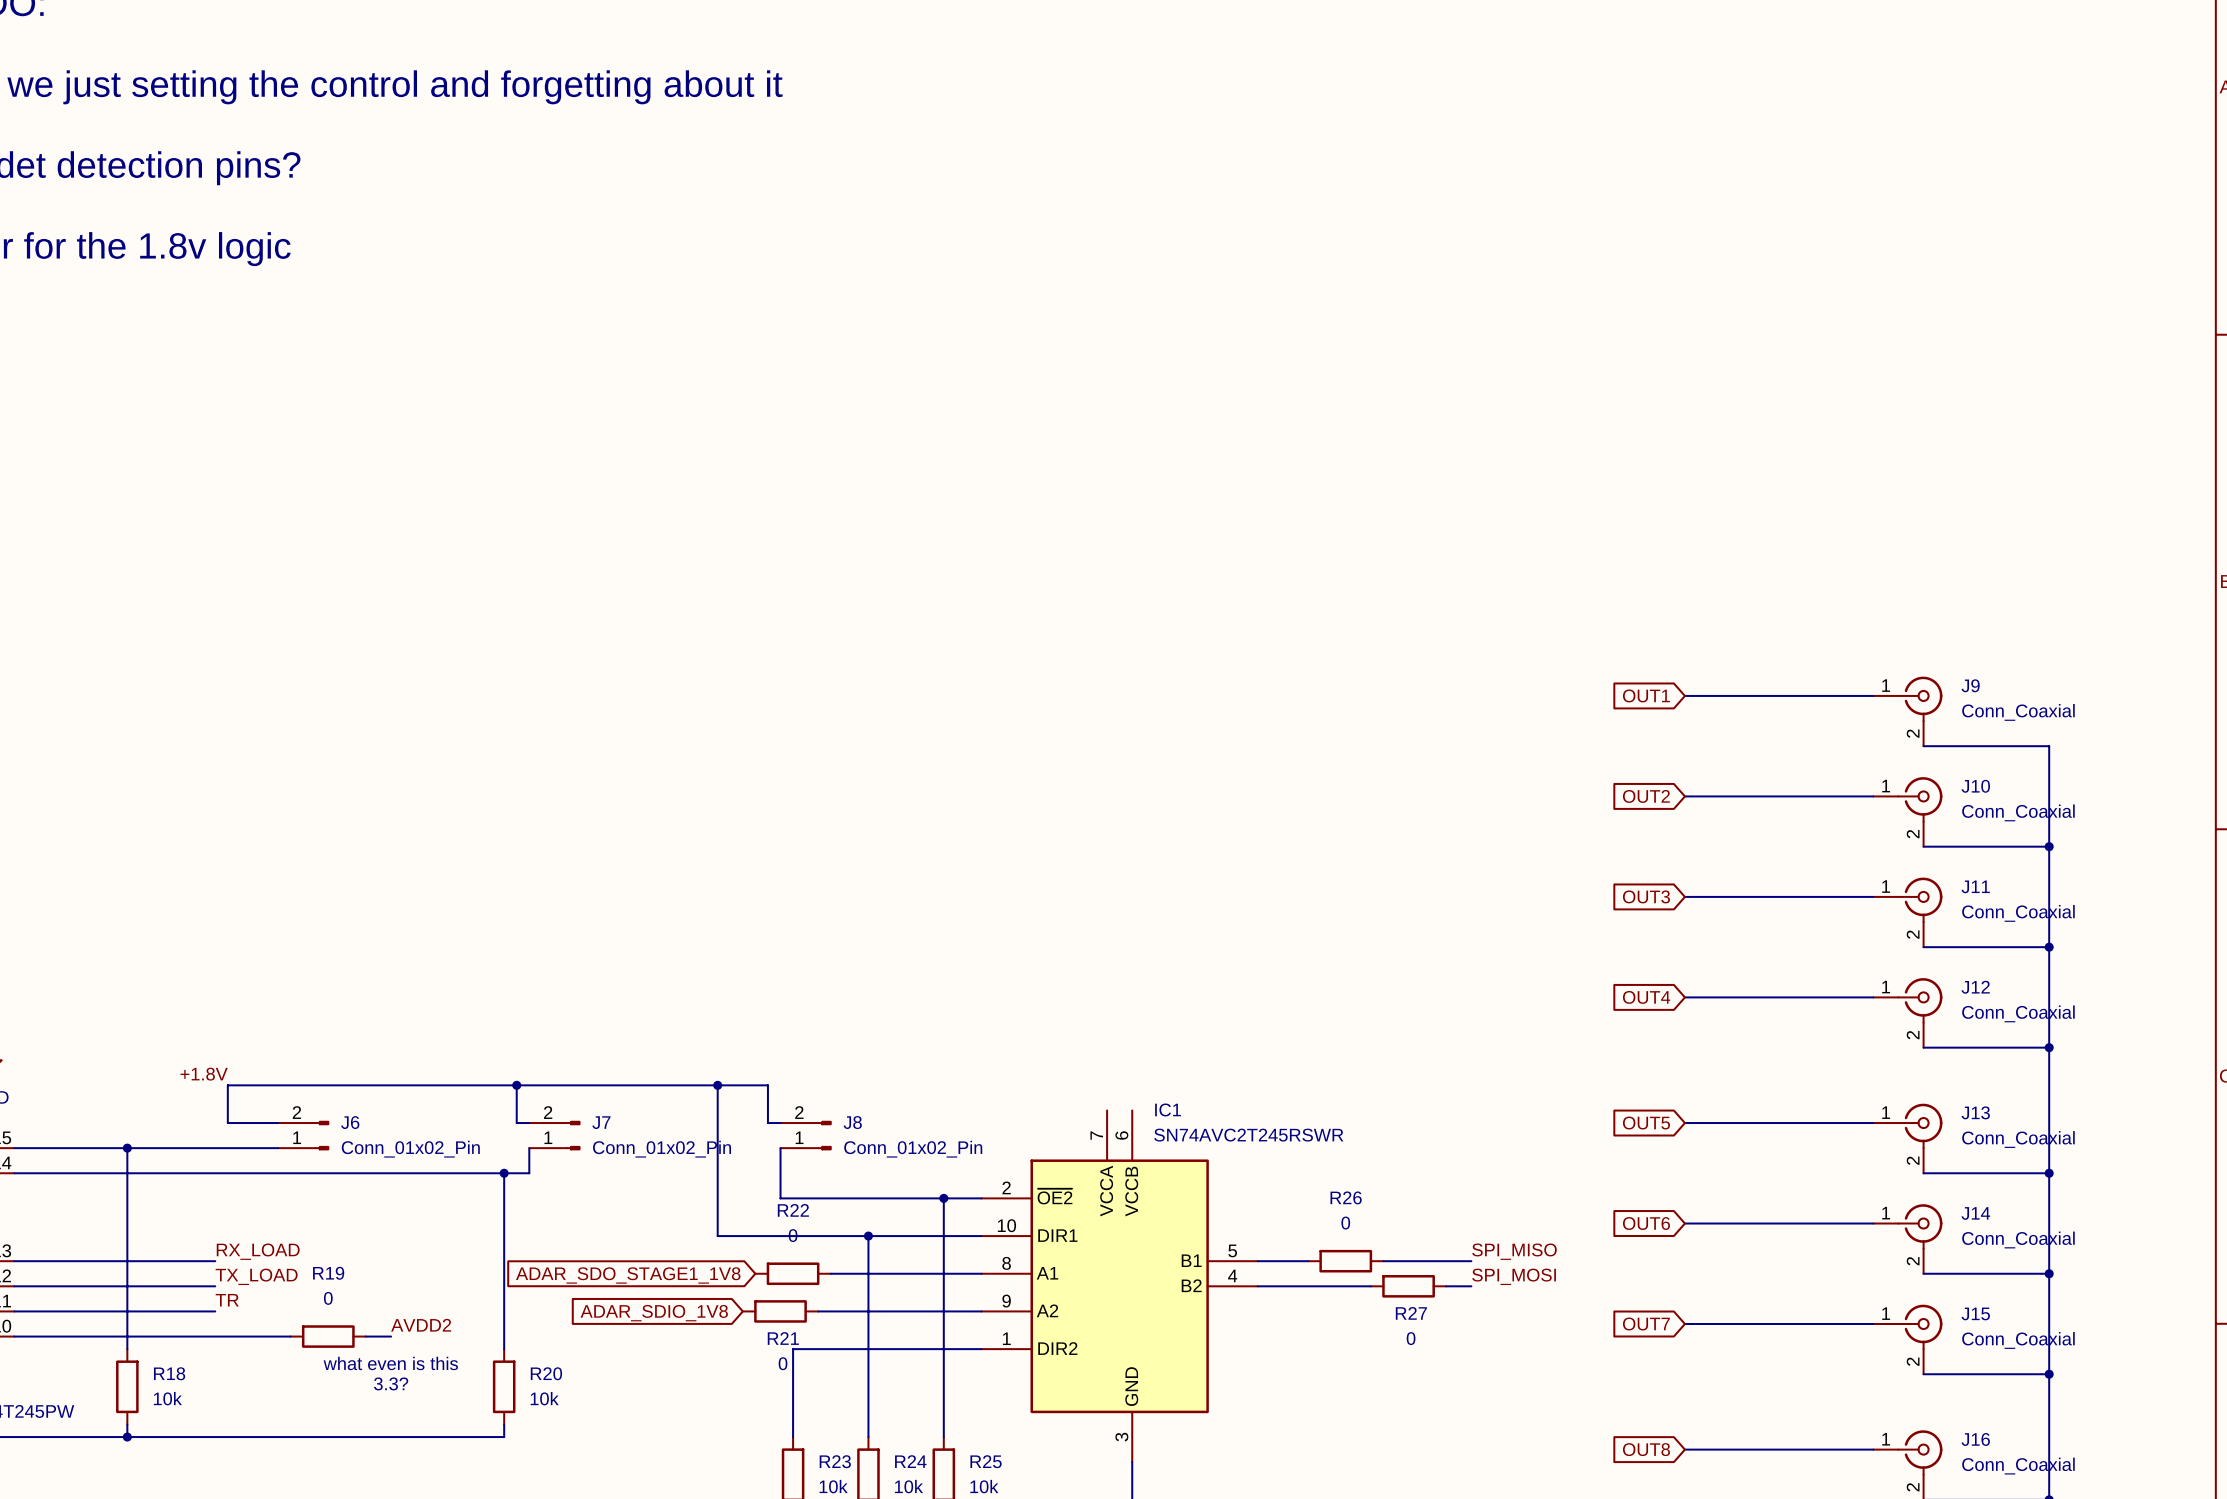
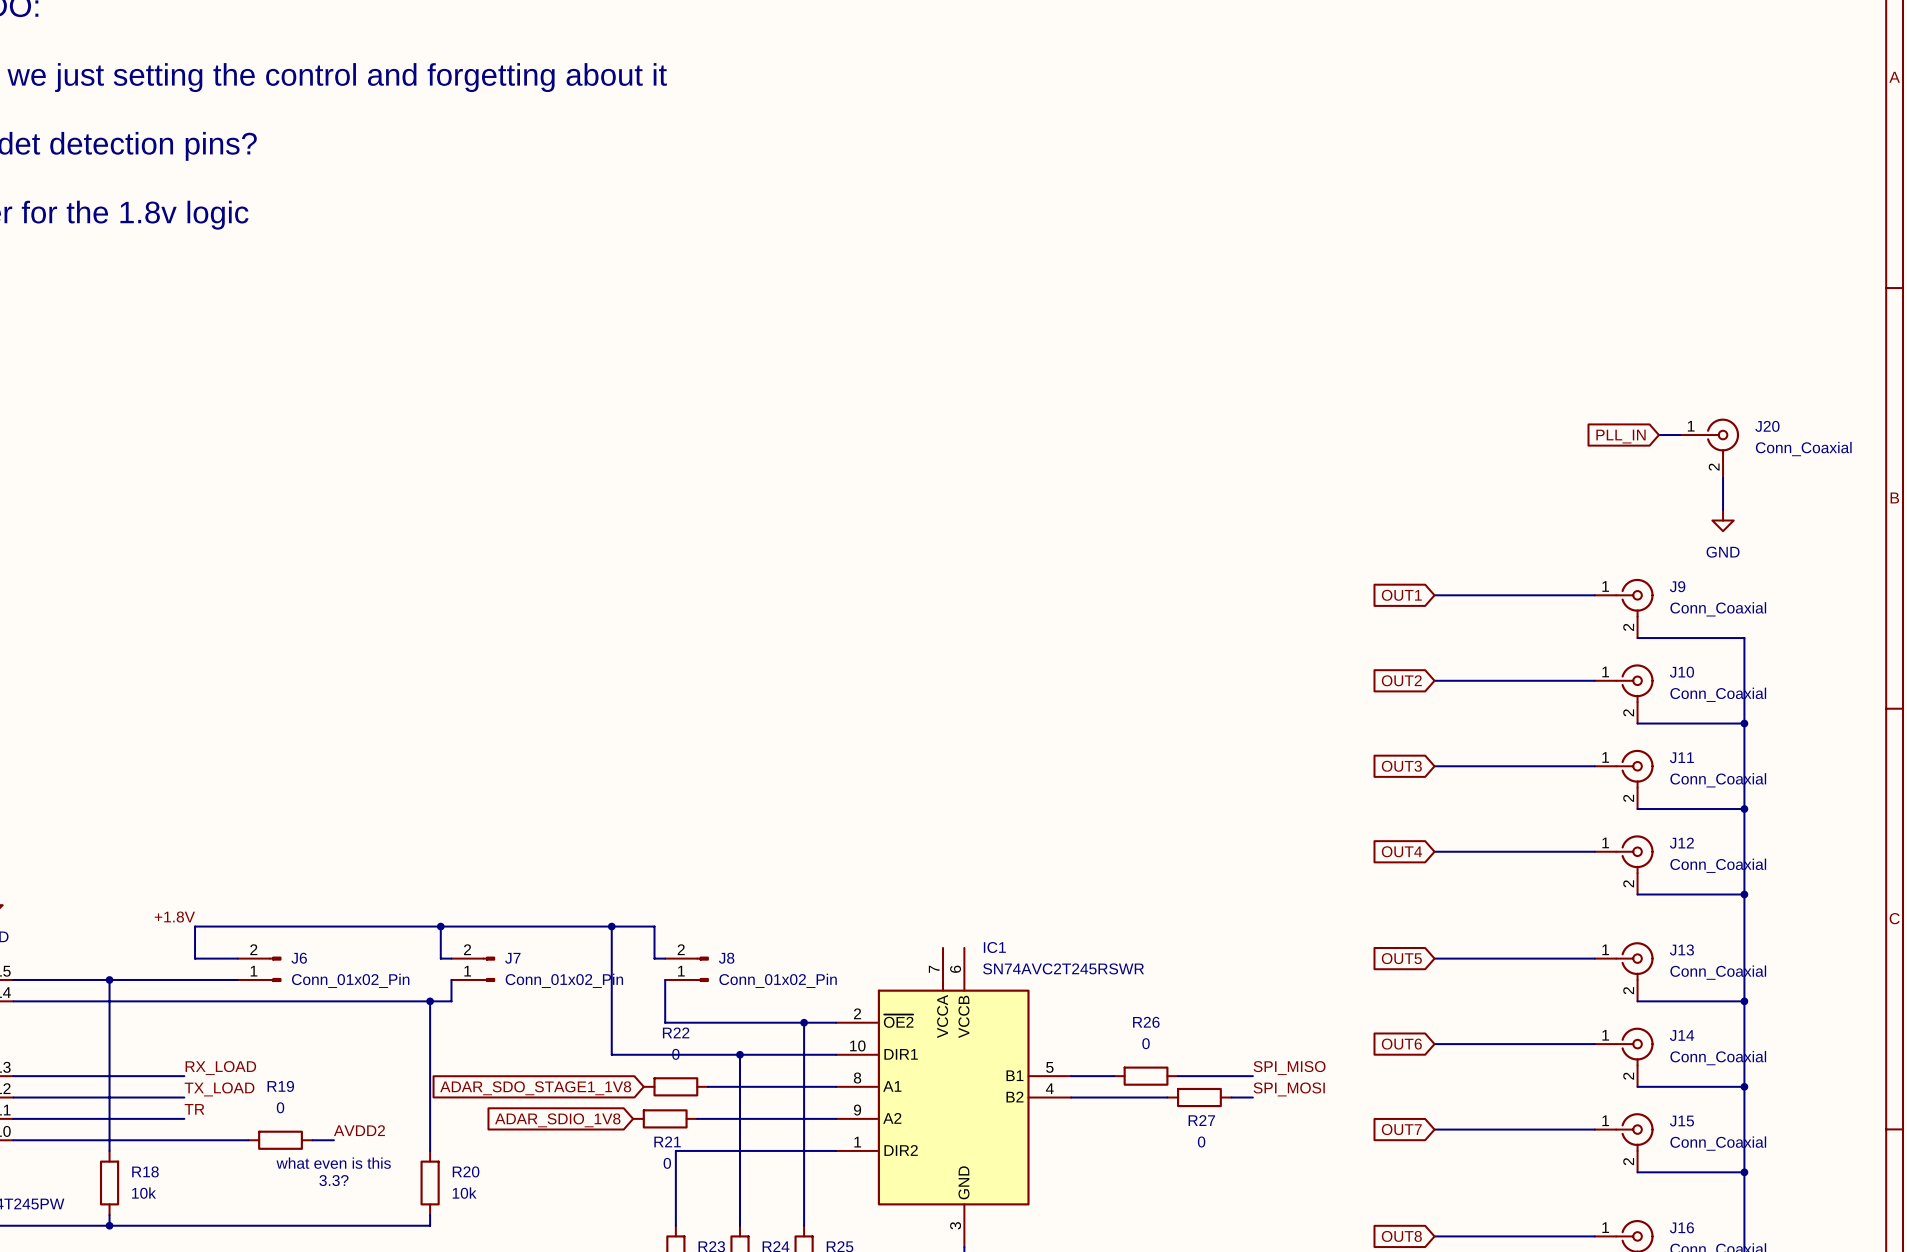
wire: none -> (1658, 435) (1680, 435)
global label: none -> PLL_IN (1621, 436)
J20: none -> Conn_Coaxial (1709, 448)
wire: none -> (1723, 477) (1723, 509)
power symbol: none -> GND (1723, 520)

